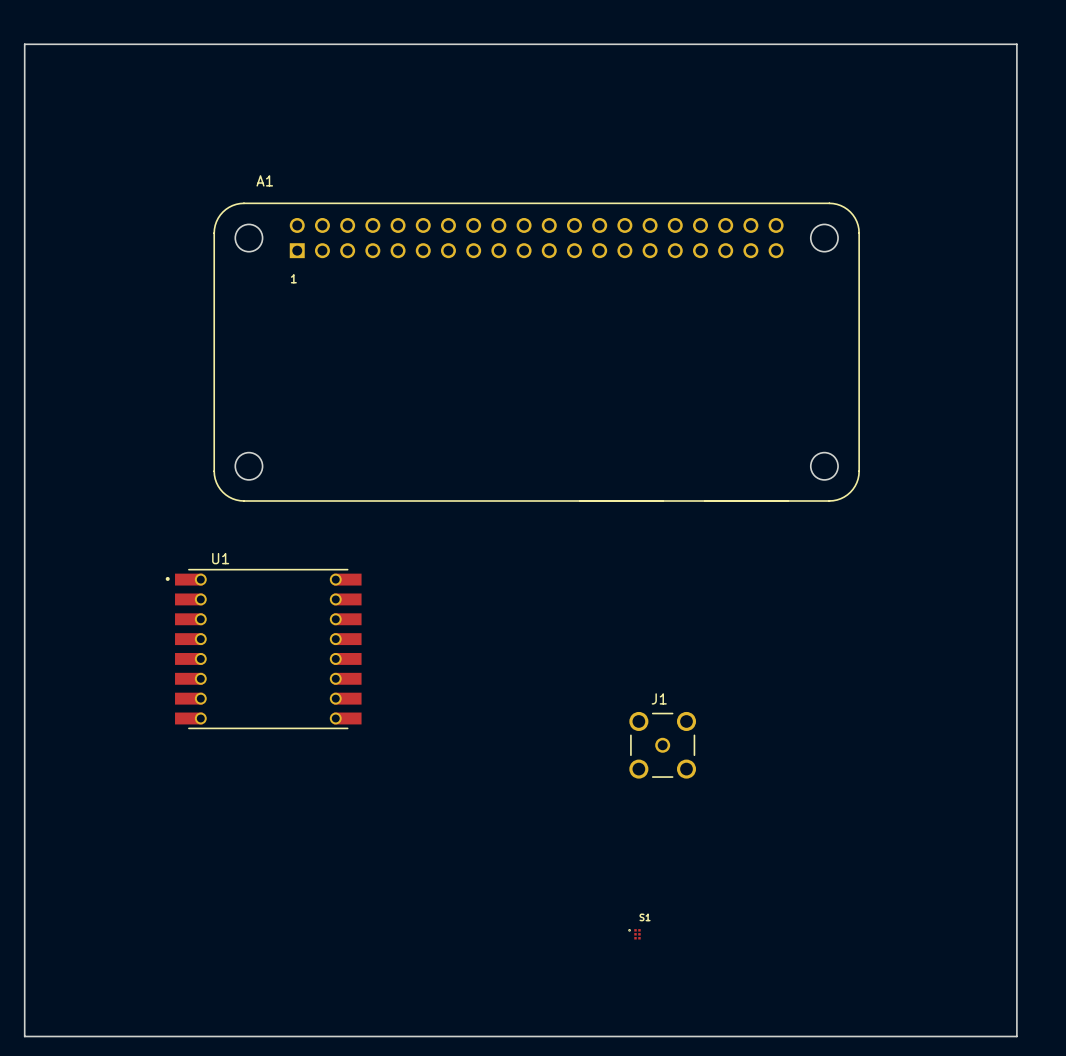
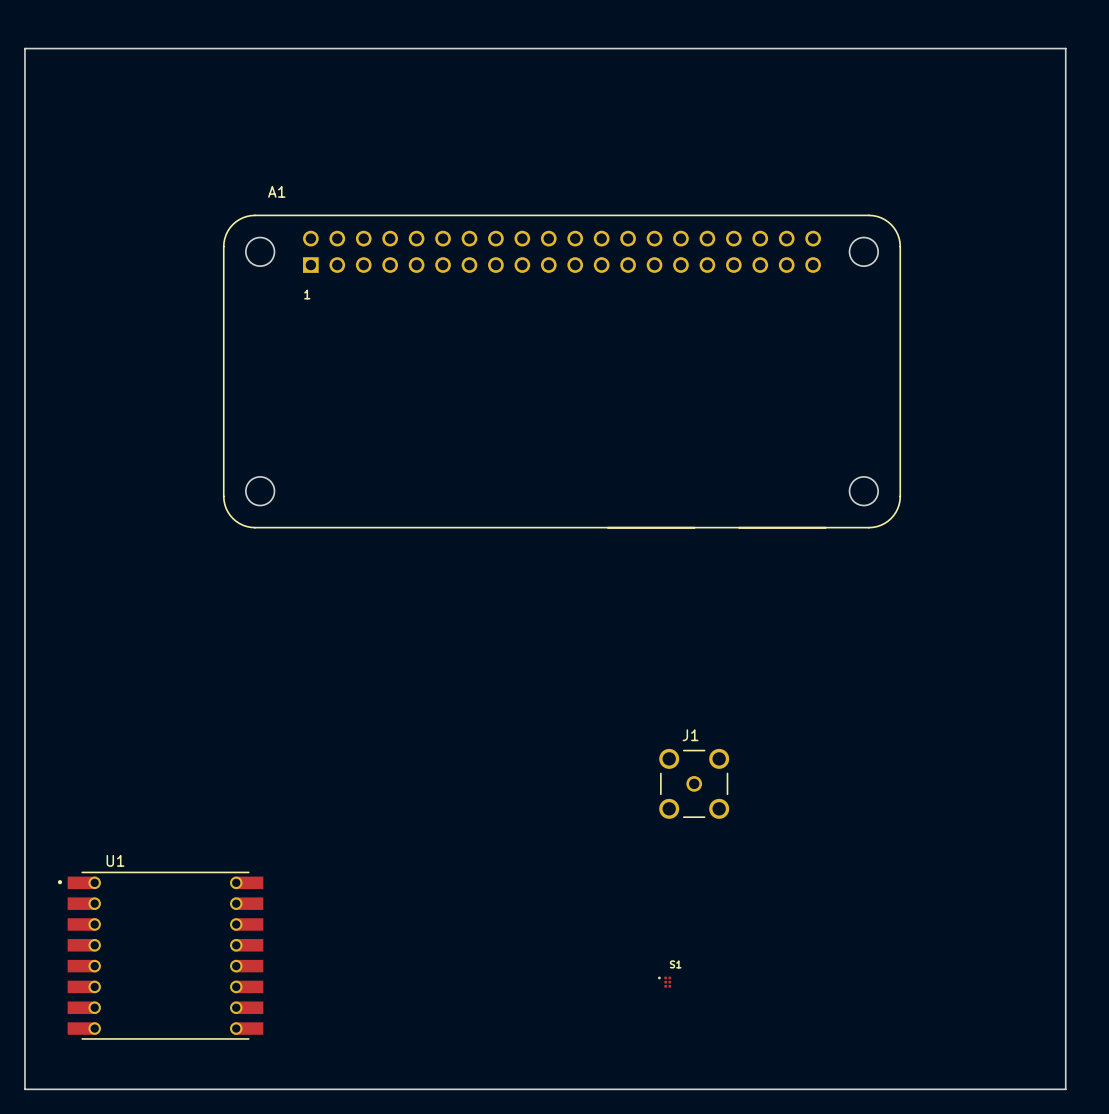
U1 position: (263, 649) -> (160, 955)

